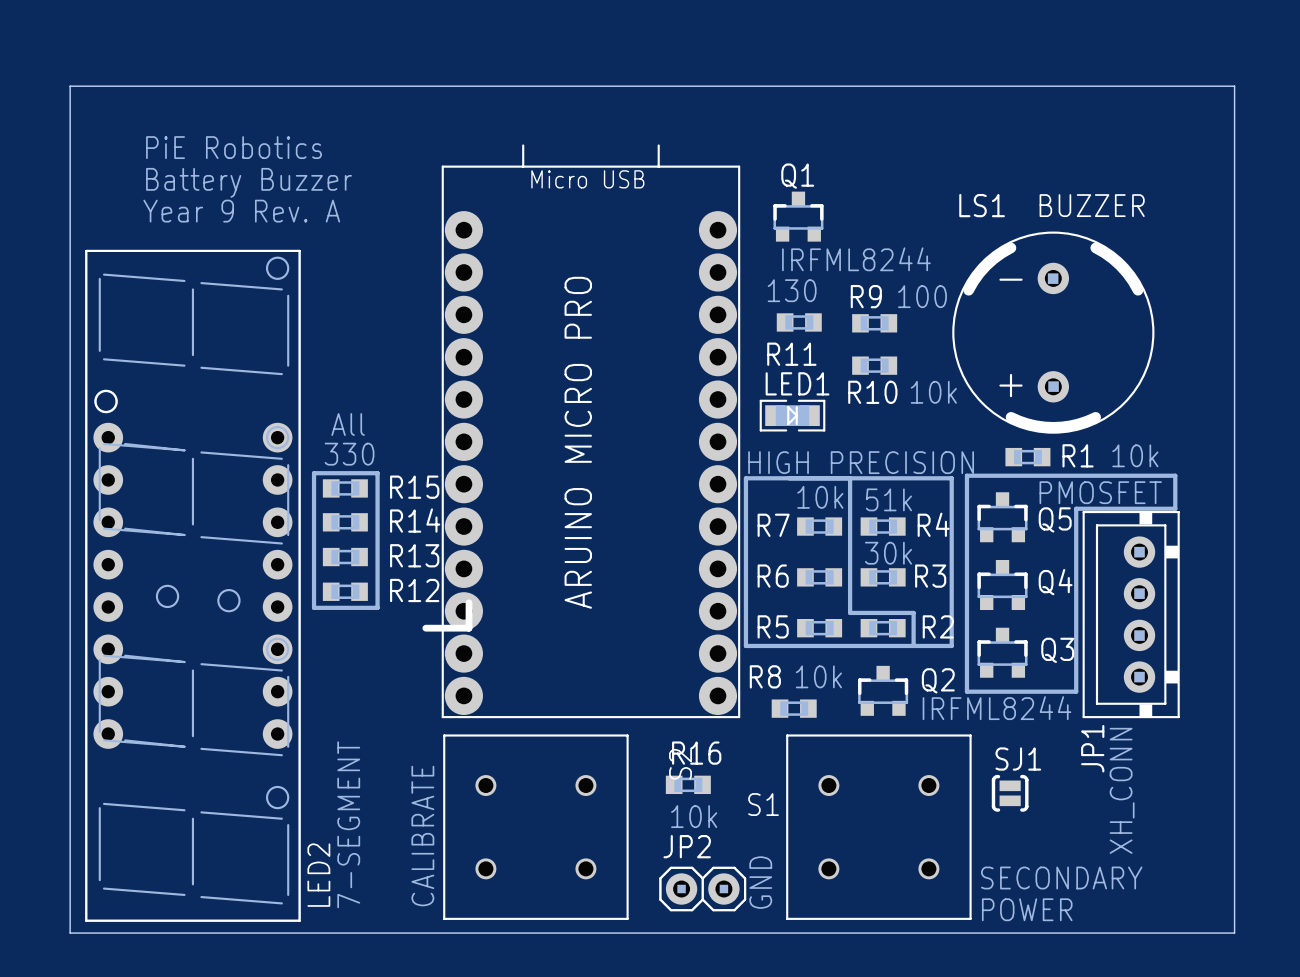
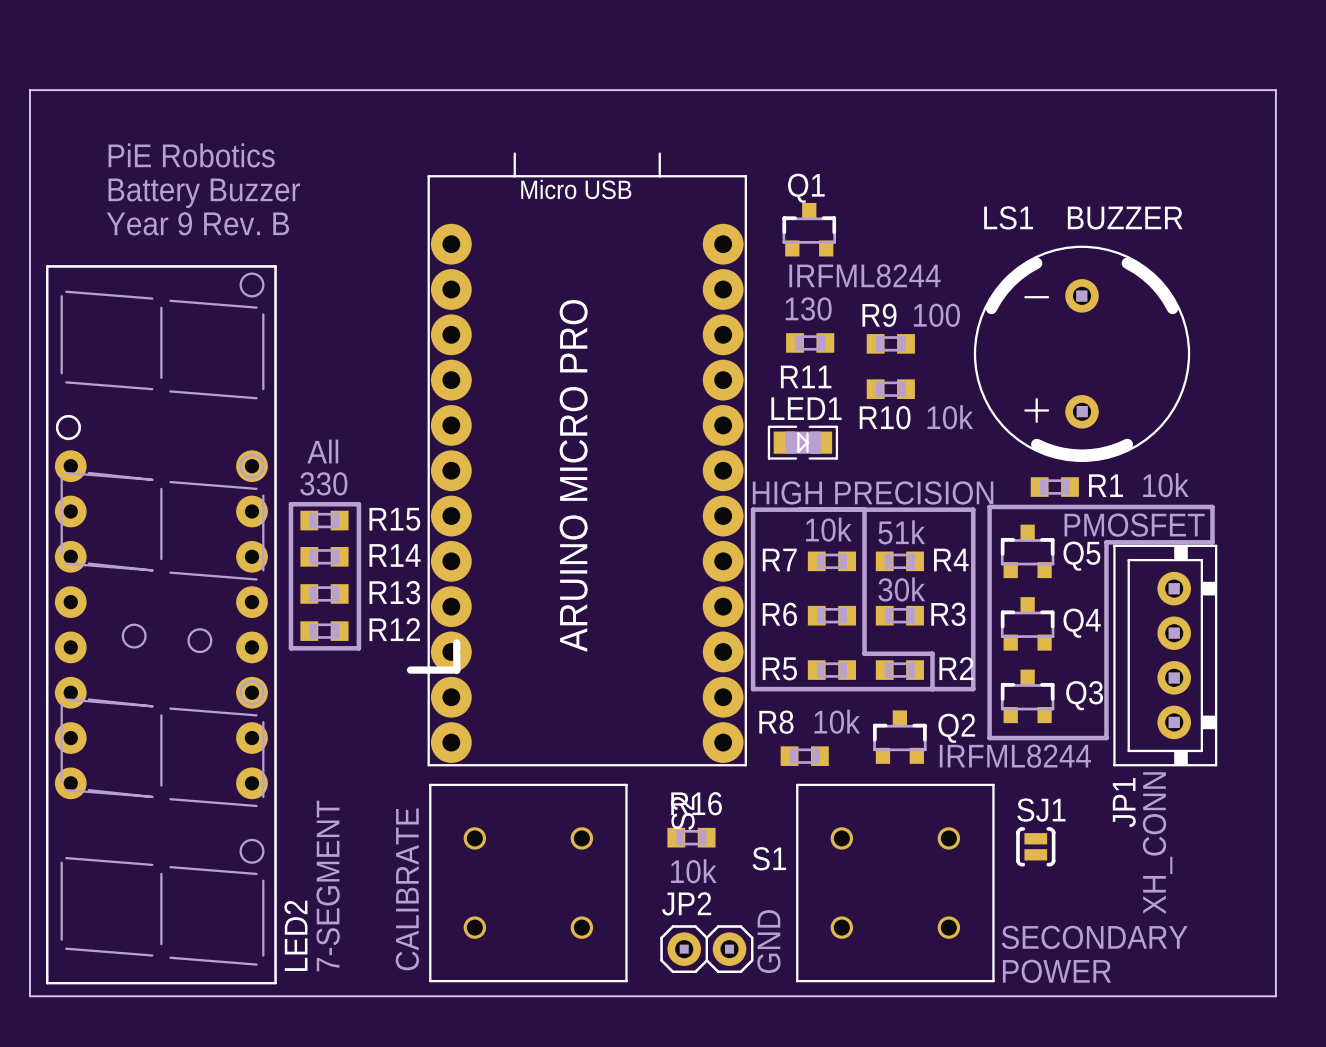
text: Year 9 Rev. A (241, 211) -> Year 9 Rev. B (197, 223)

